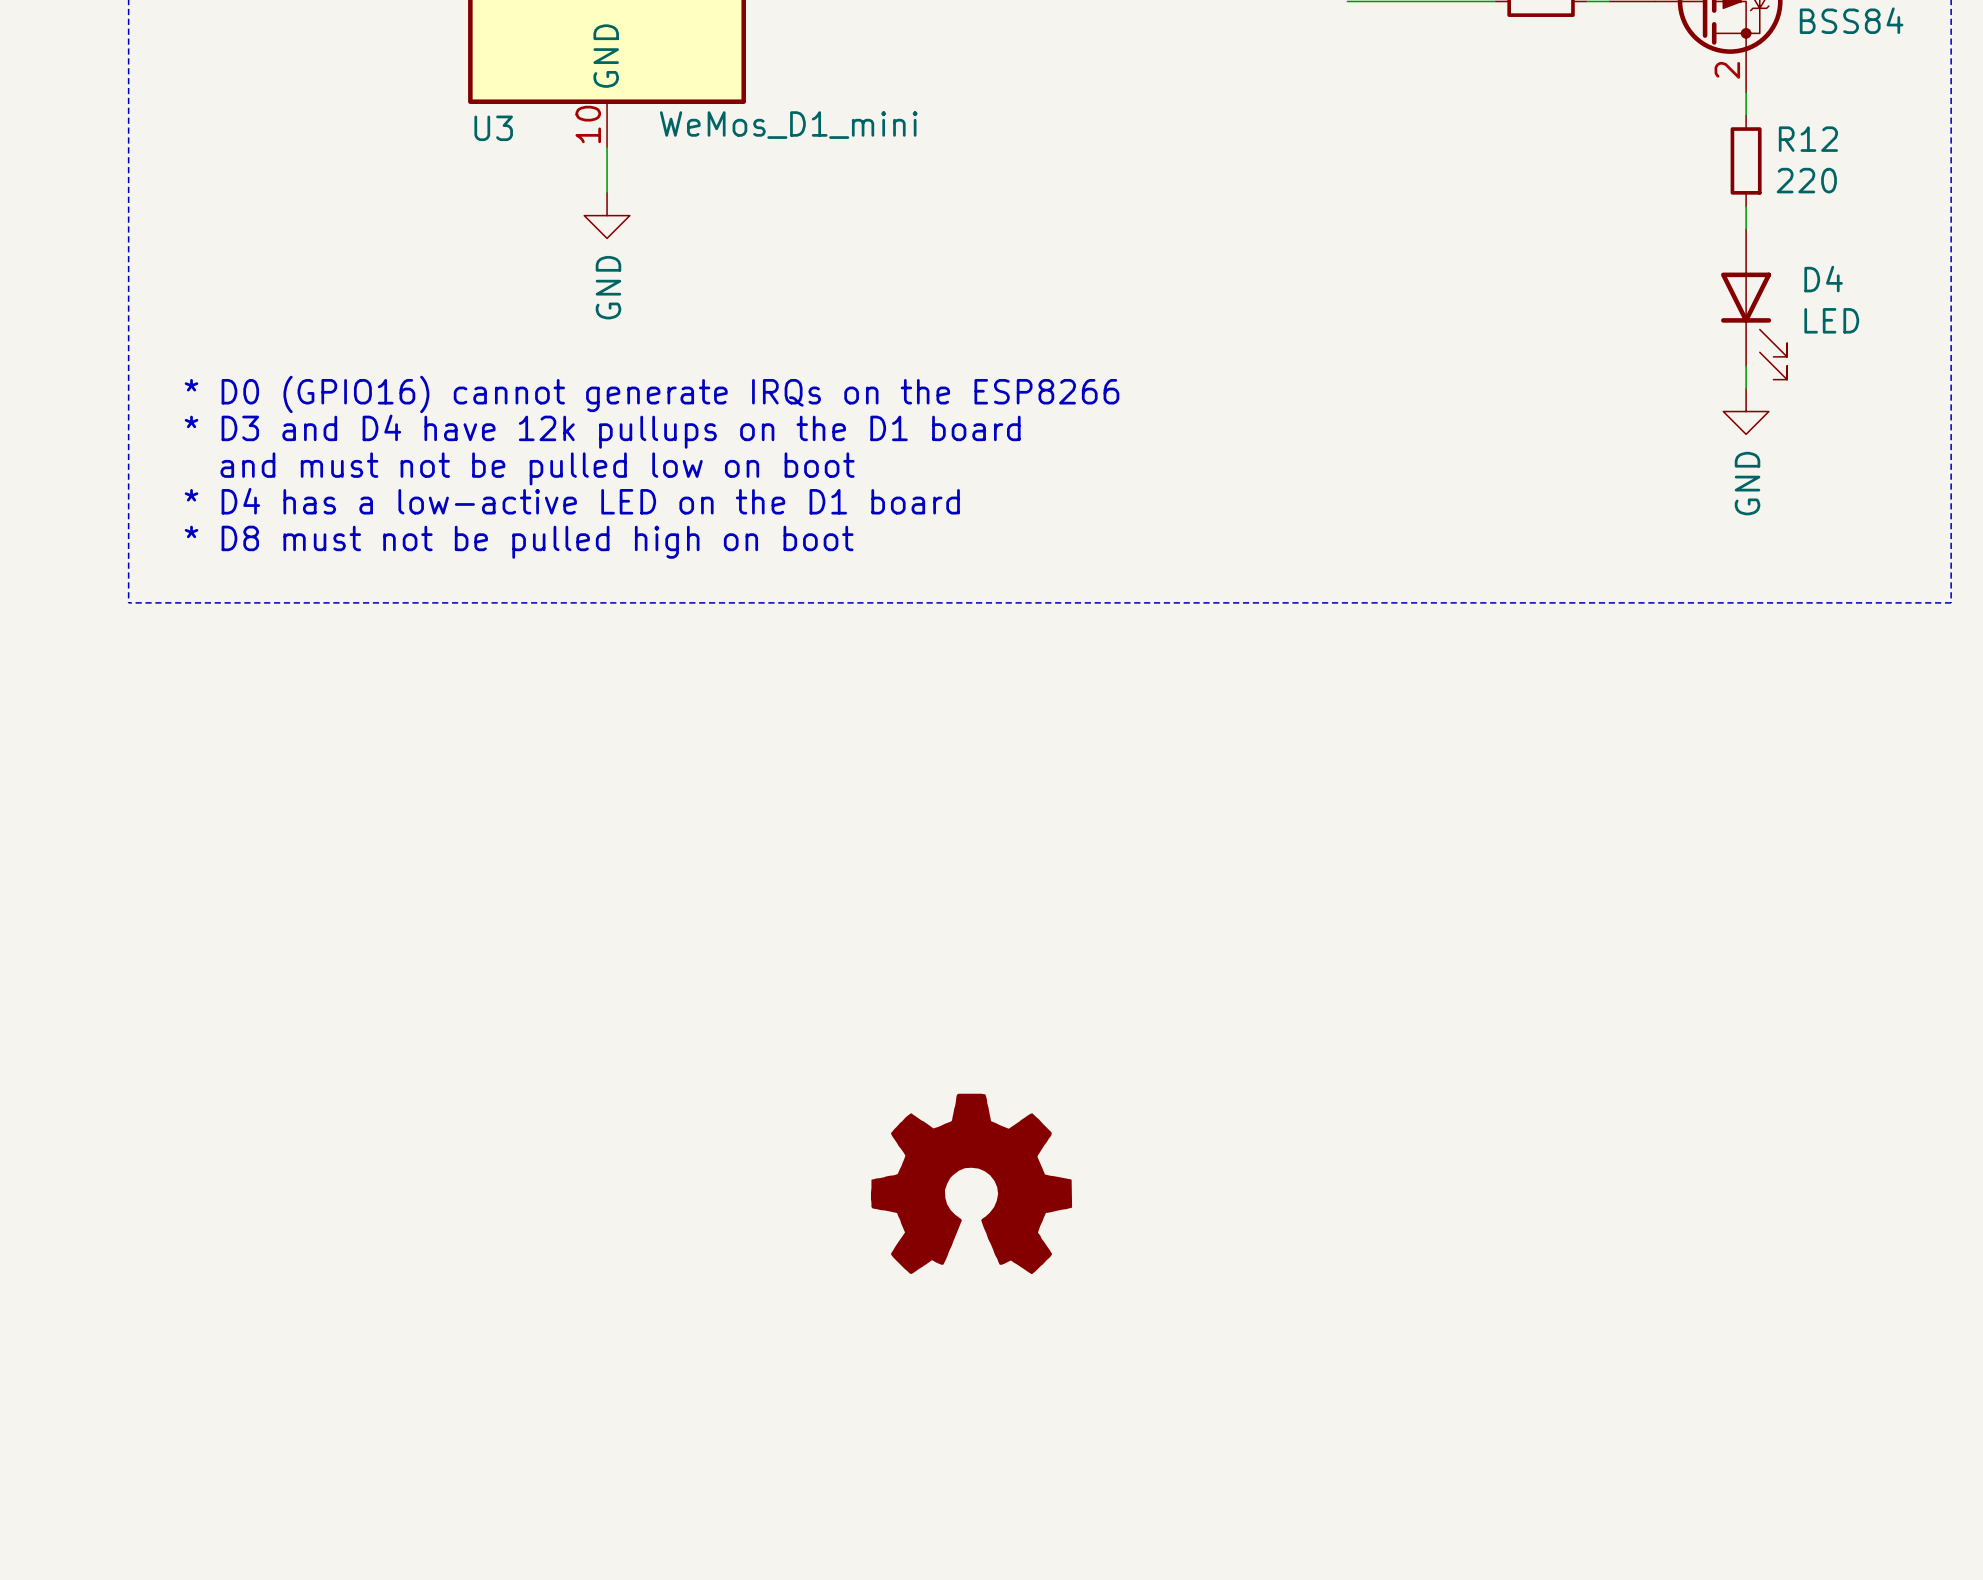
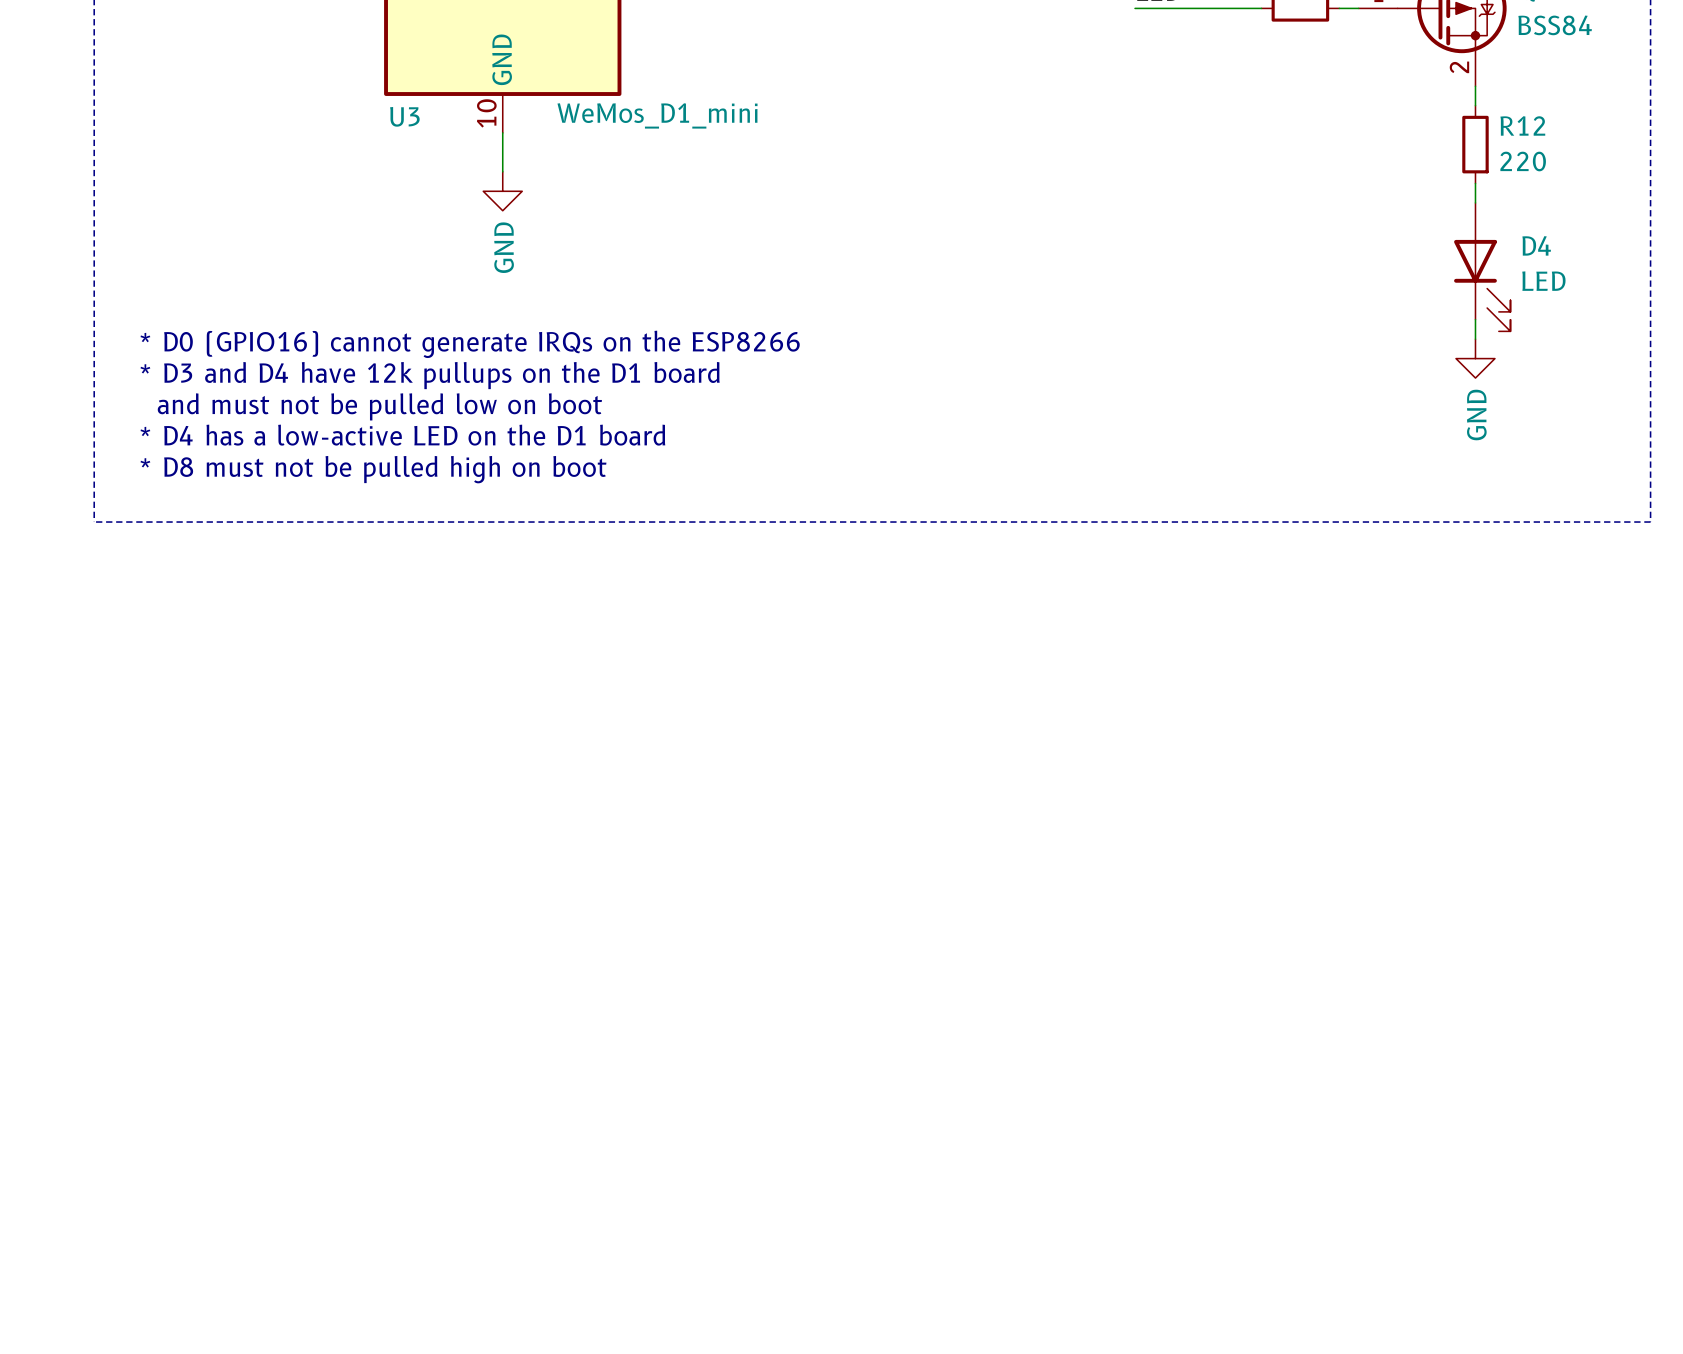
power symbol: (971, 1183) -> none

